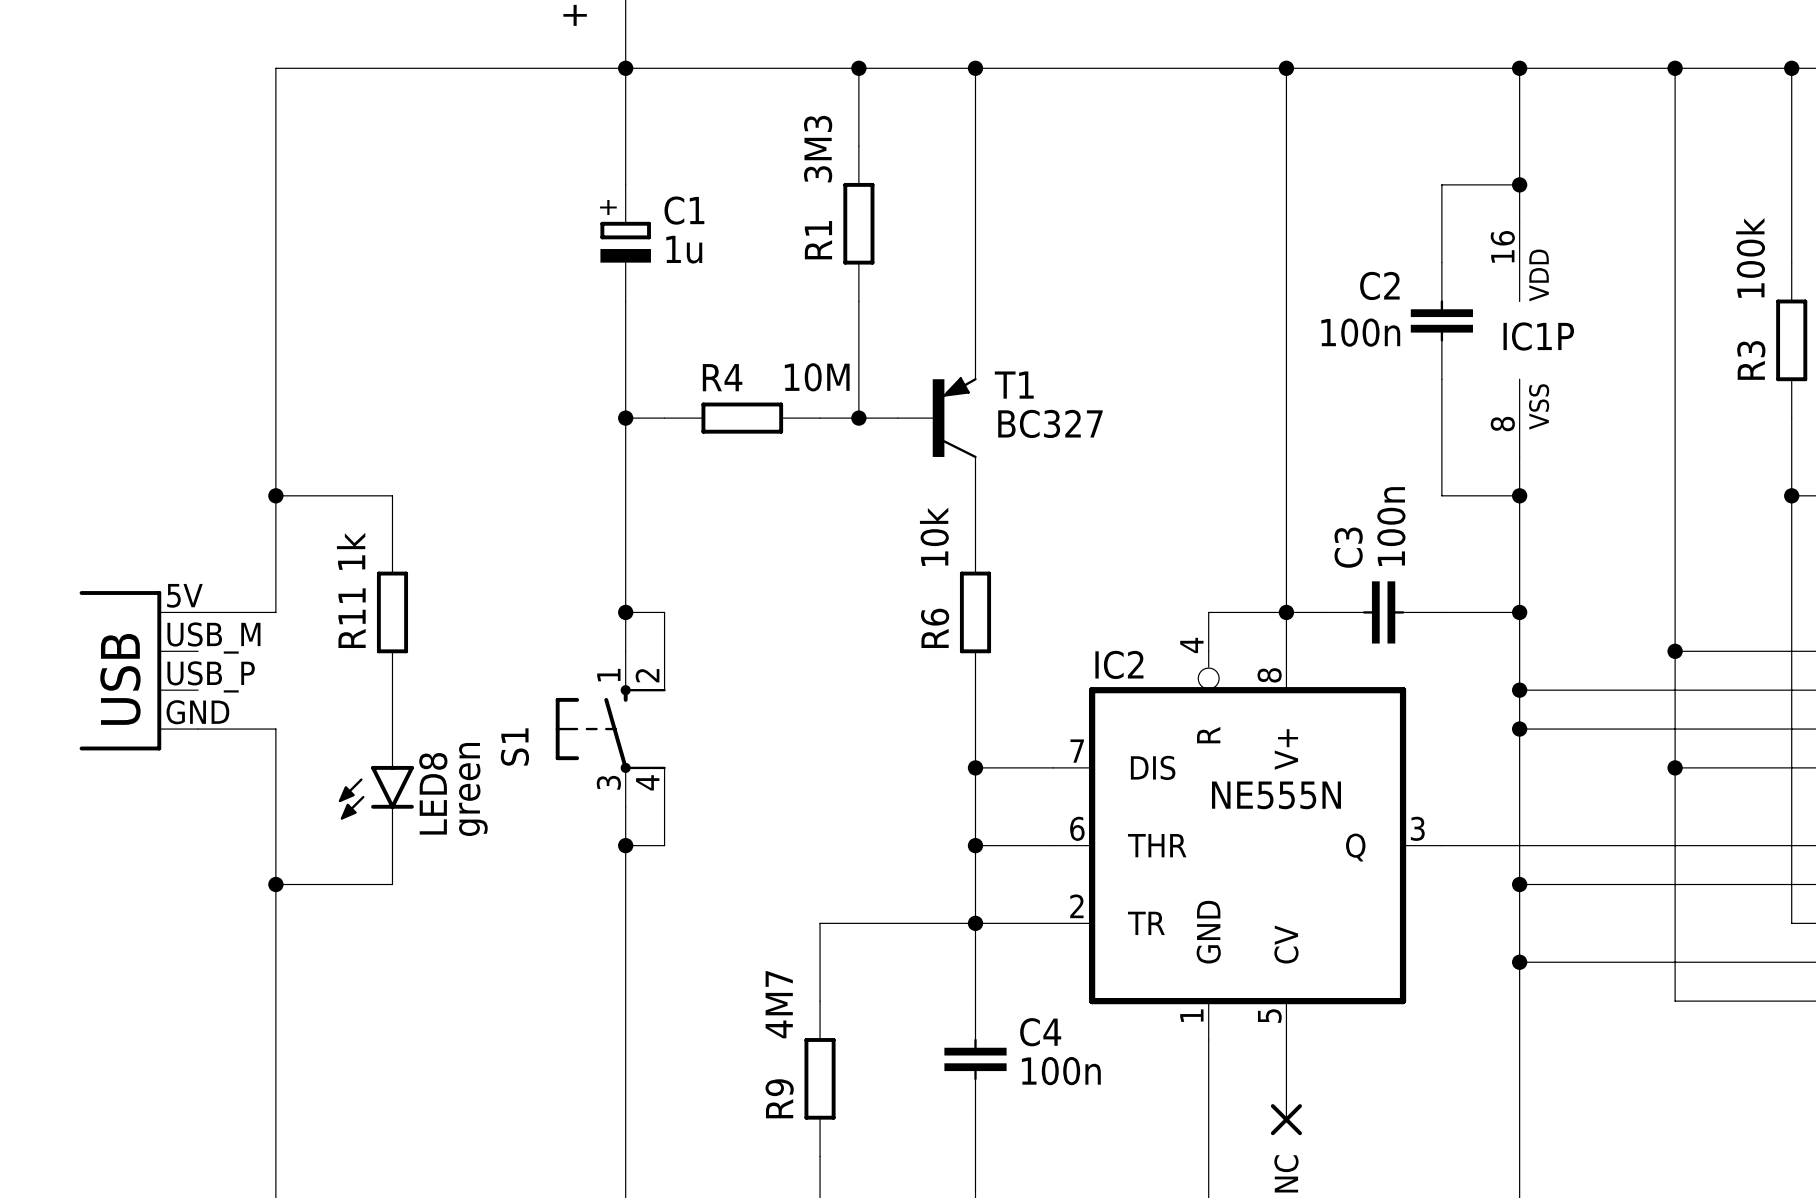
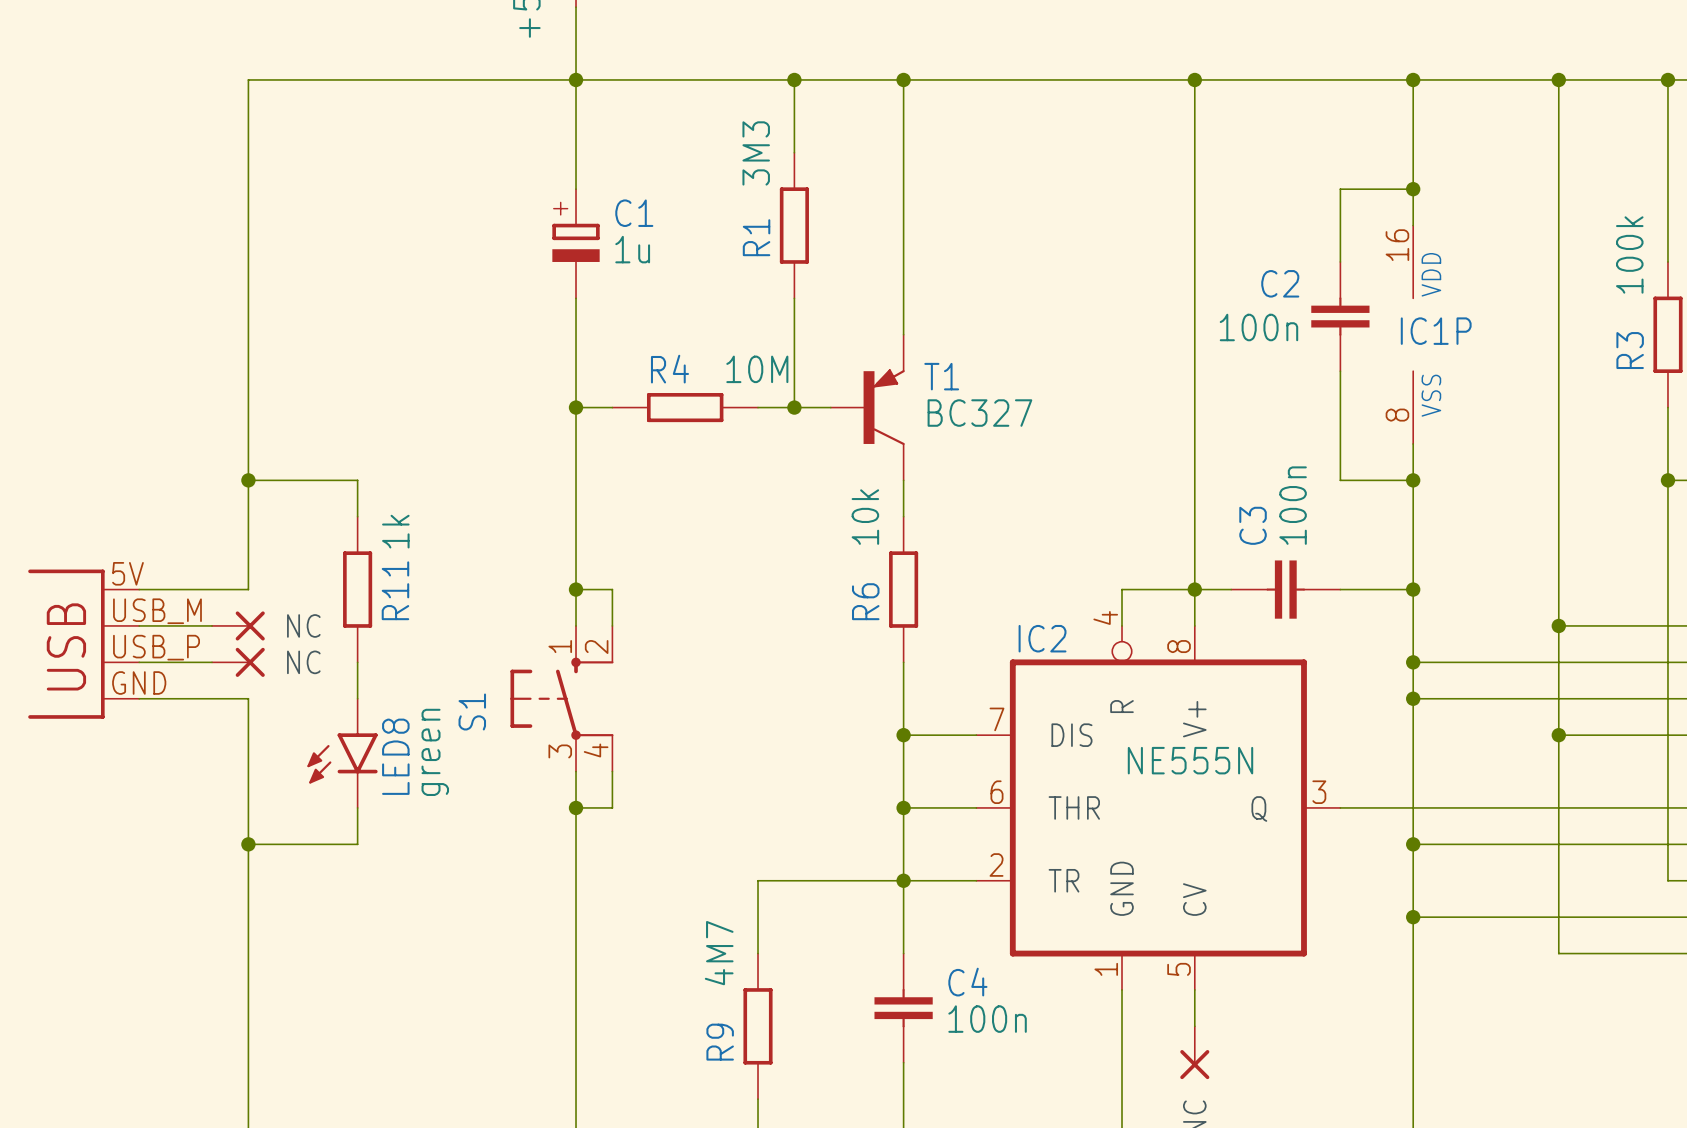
R11 value position: 1k (351, 551) -> 1k (395, 531)
R11 name position: R11 (352, 618) -> R11 (395, 590)
wire: none -> (139, 625) (212, 625)
part: none -> (238, 625)
part position: (138, 670) -> (83, 644)
wire: none -> (139, 662) (212, 662)
part: none -> (238, 662)

